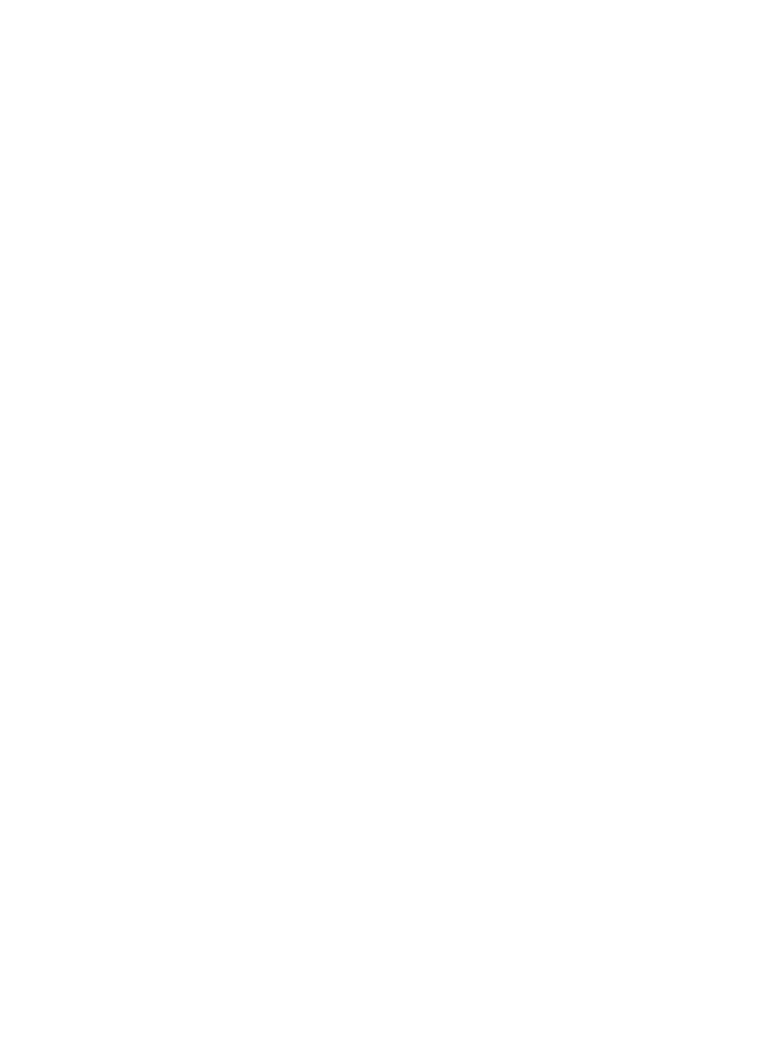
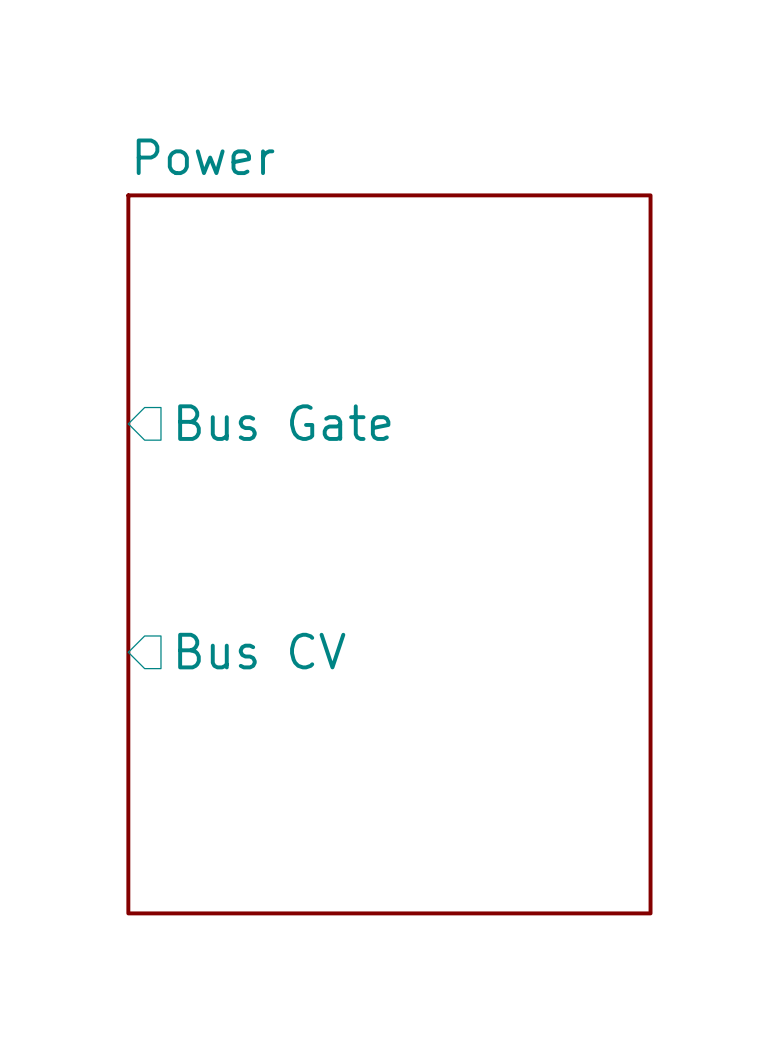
sheet pin: none -> Bus Gate (284, 422)
sheet Power: none -> (389, 554)
sheet pin: none -> Bus CV (261, 651)

